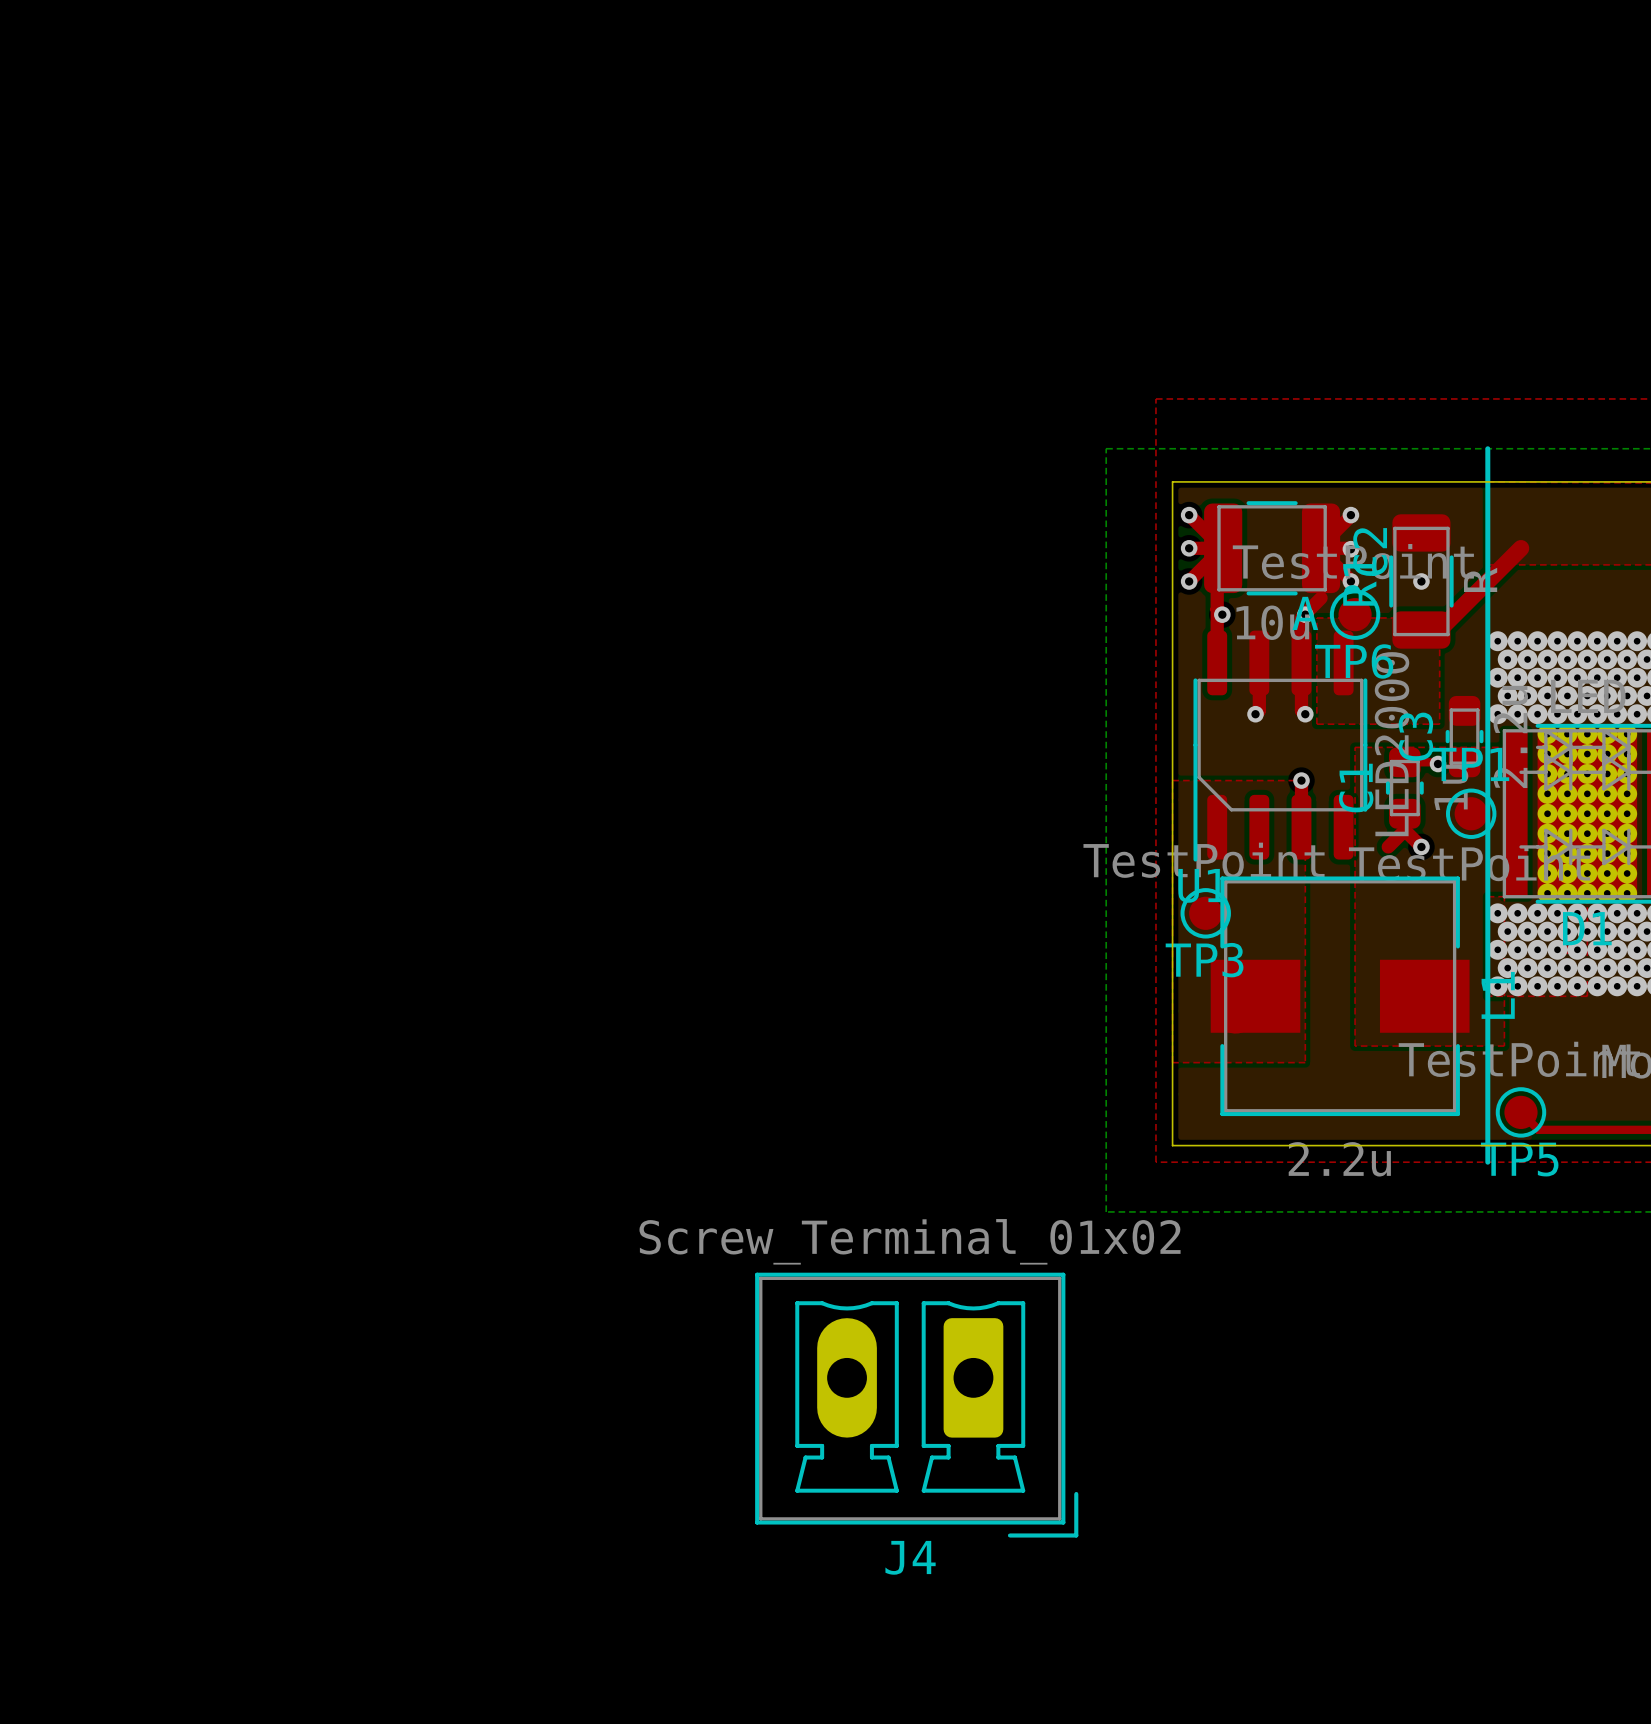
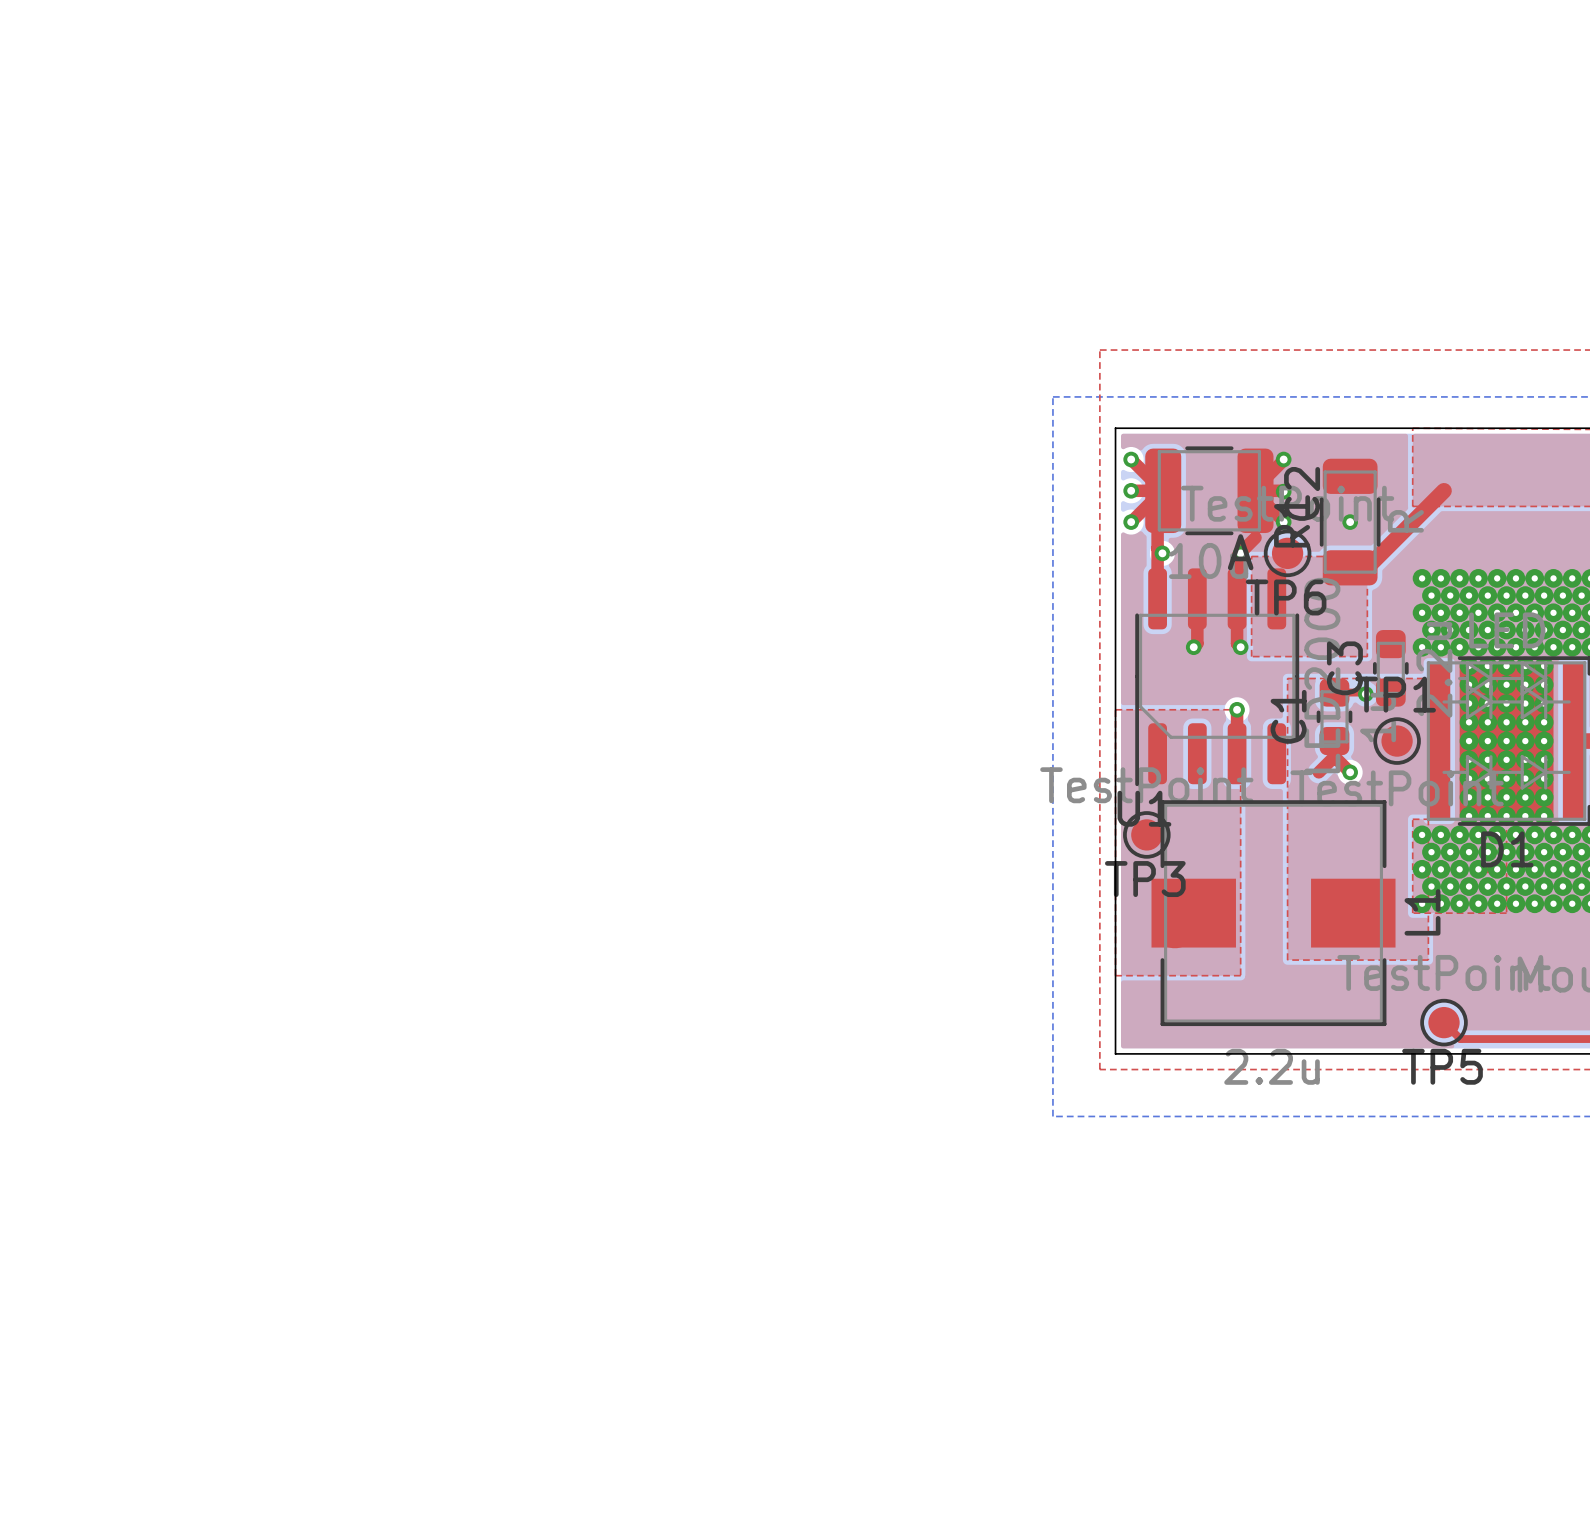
line: (1487, 448) (1487, 1162) -> none
J4: Screw_Terminal_01x02 (916, 1405) -> none

